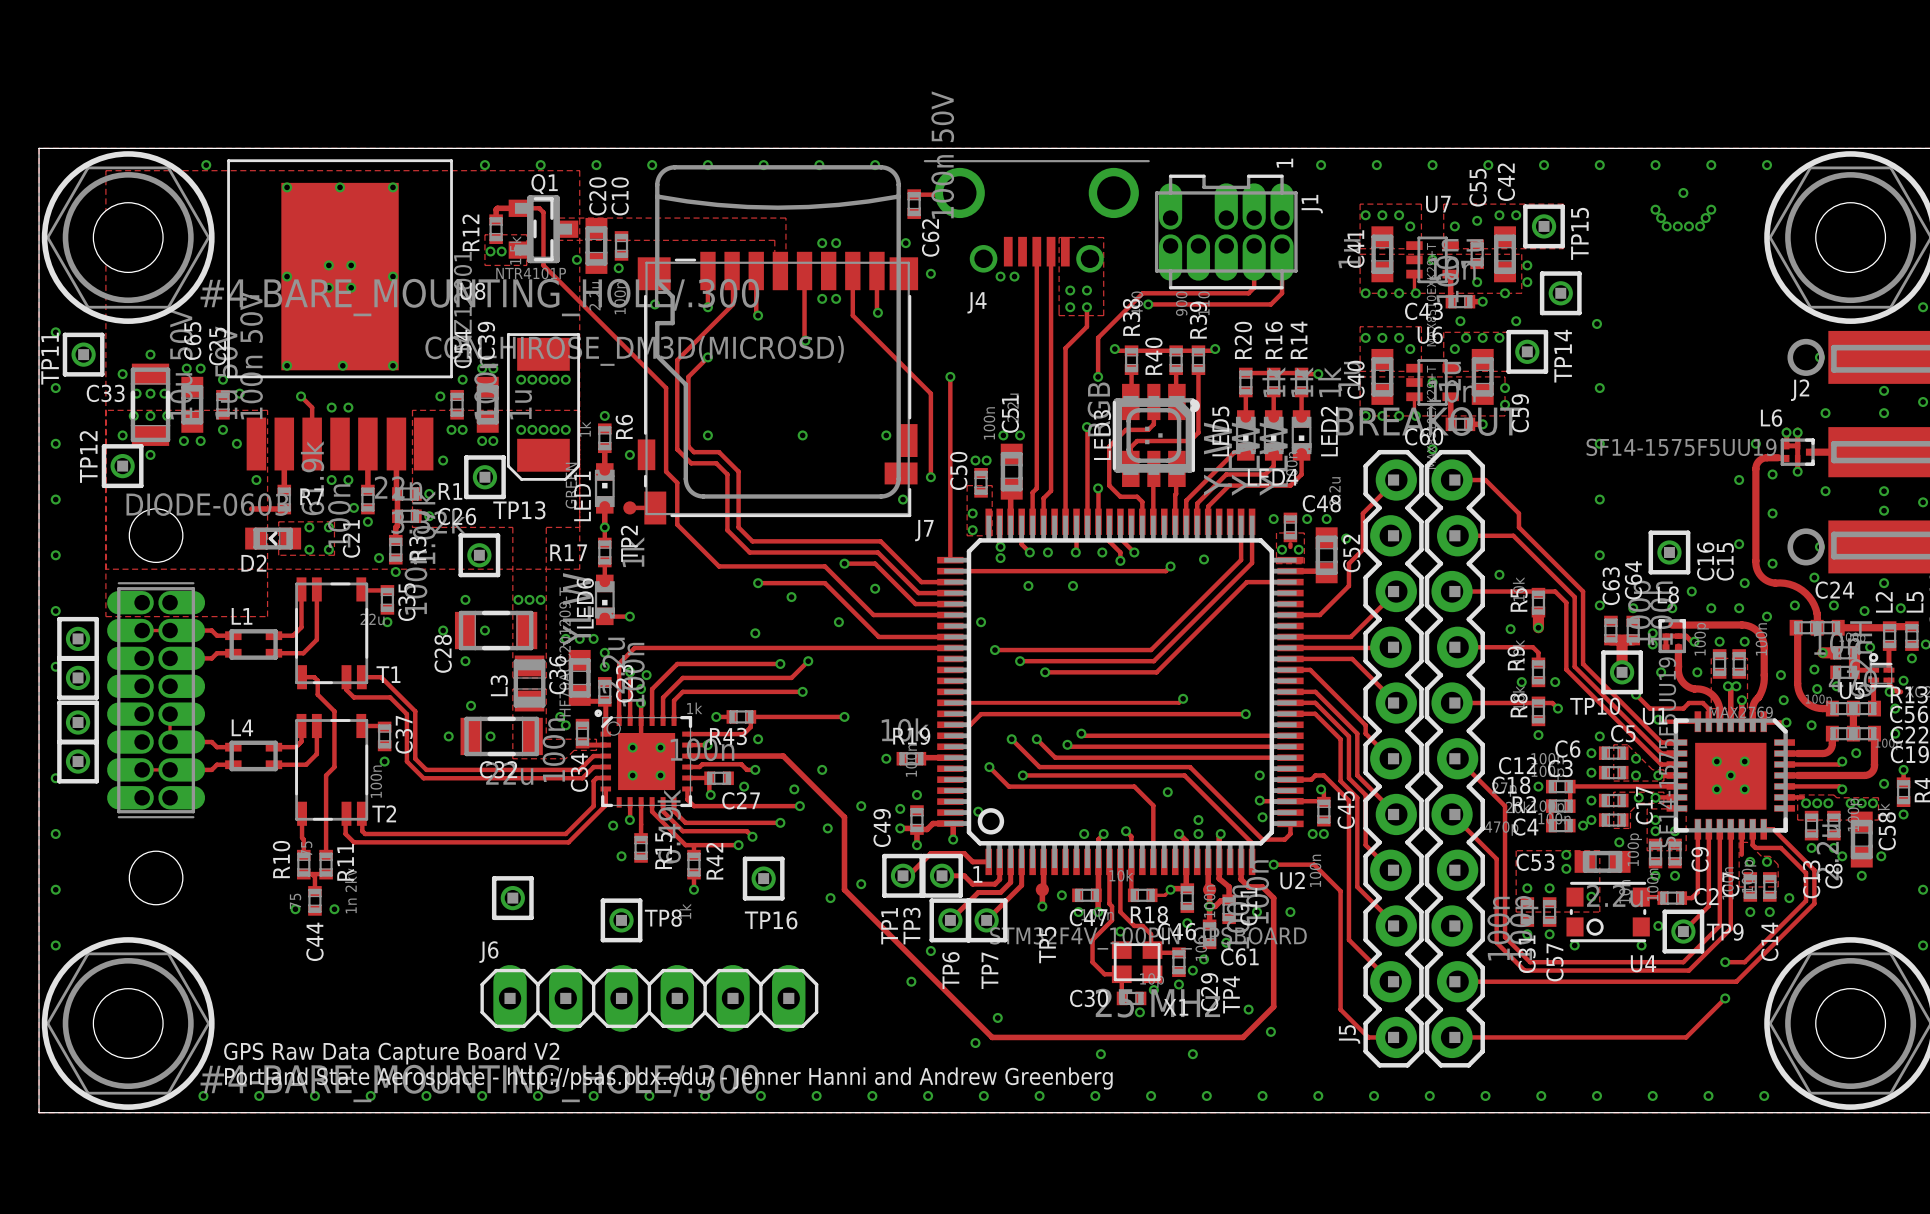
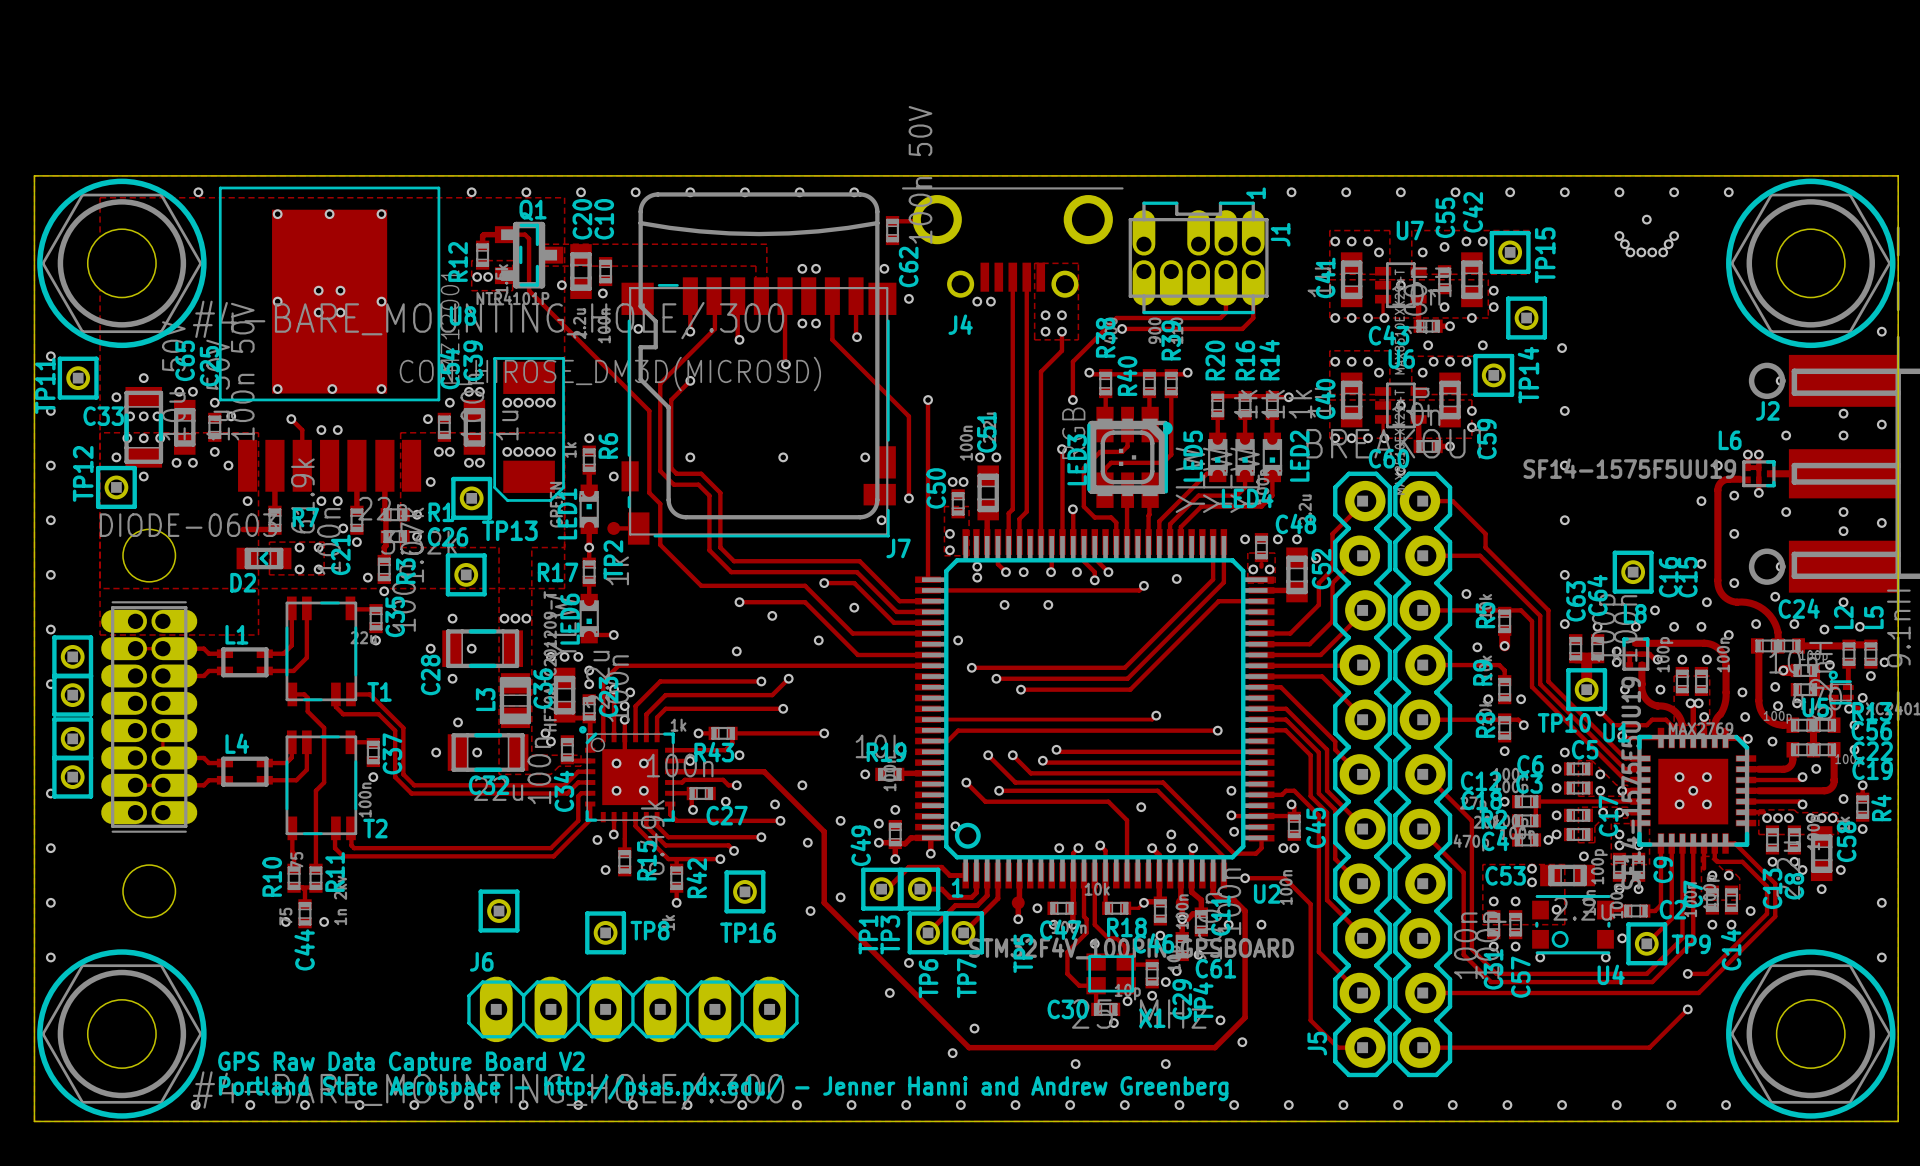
track: none -> (1359, 555) (1332, 583) (1332, 621) (1309, 644) (1261, 644)

